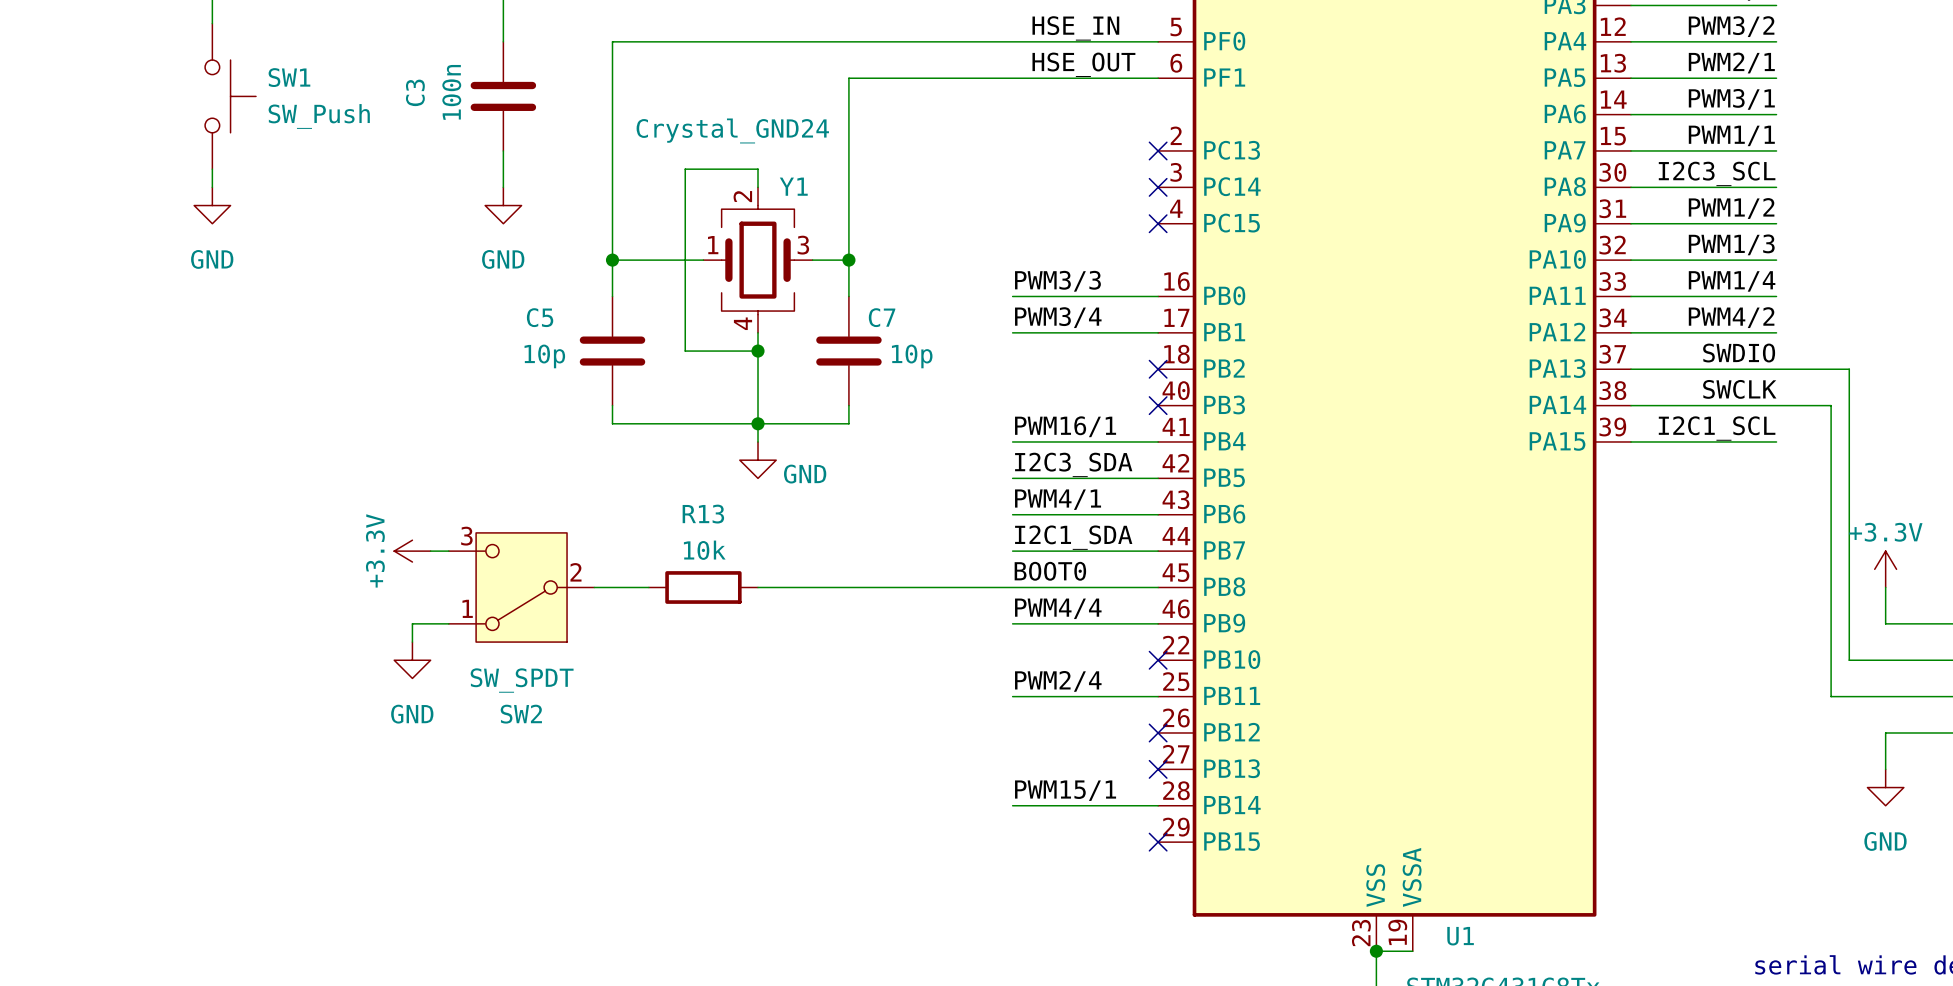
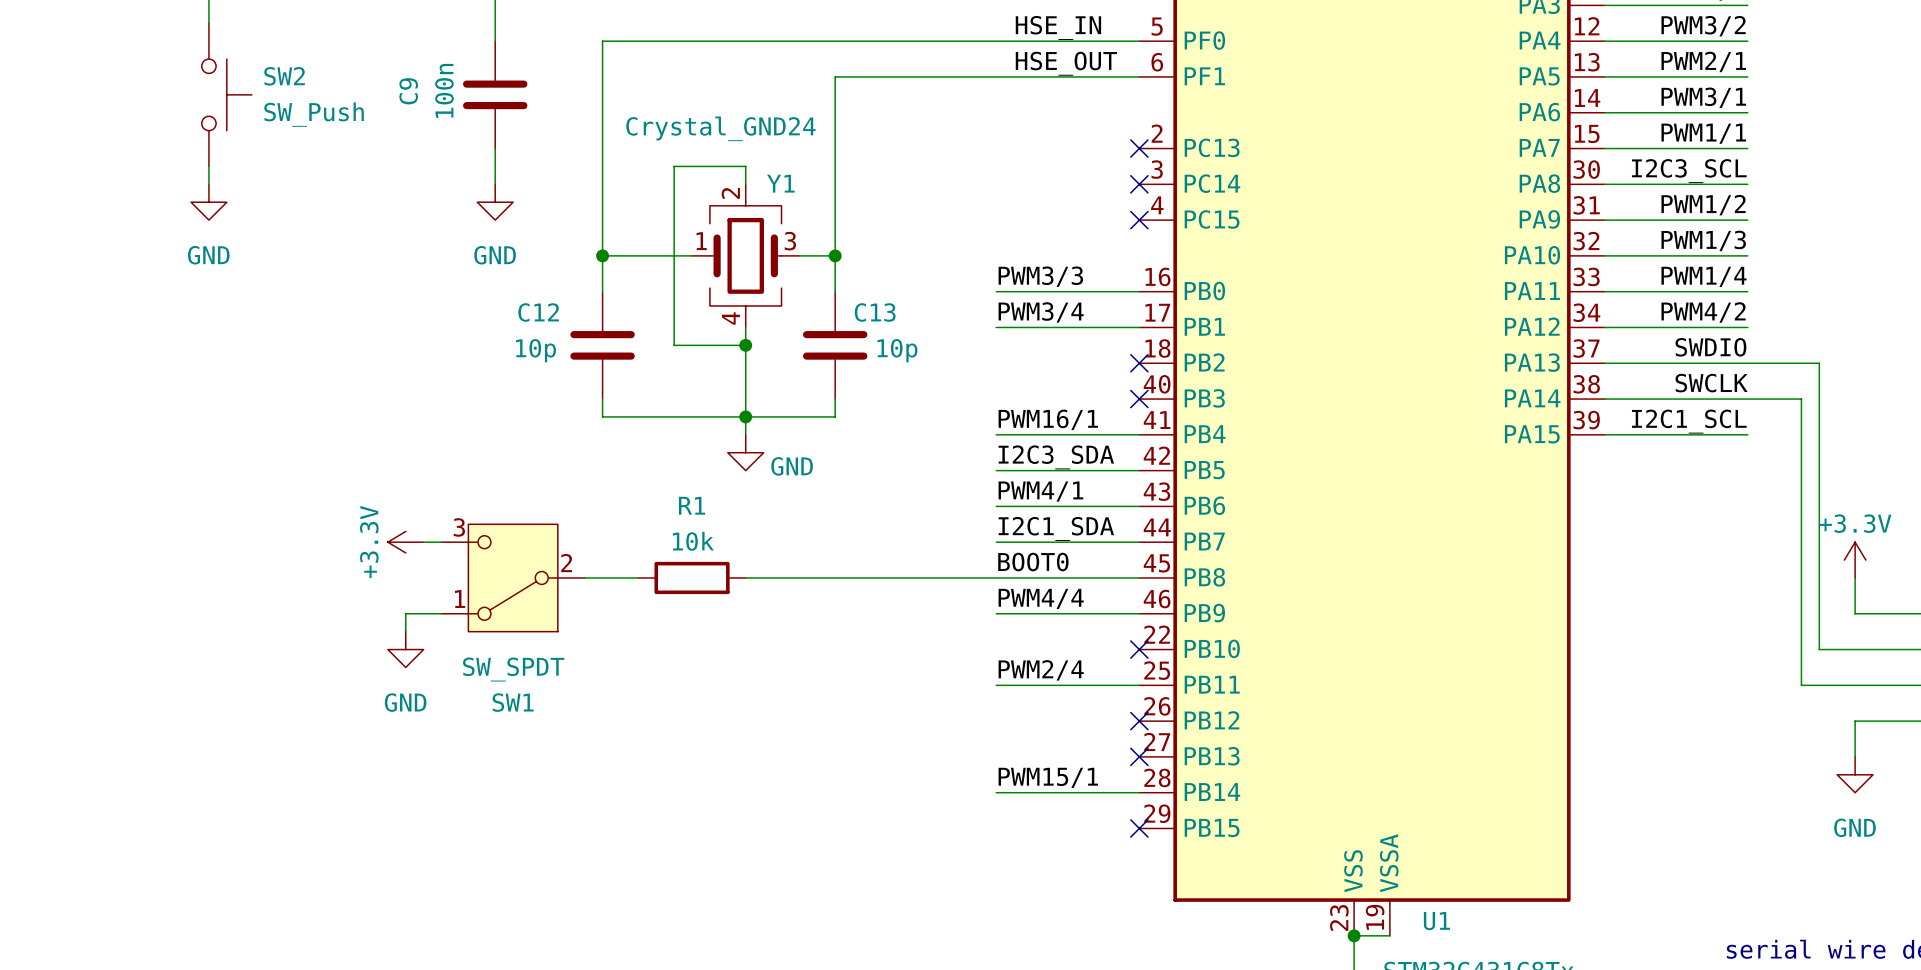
SW1 name: SW1 (289, 77) -> SW2 (284, 76)
C3 name: C3 (415, 92) -> C9 (408, 91)
C5 name: C5 (540, 317) -> C12 (538, 312)
C7 name: C7 (882, 317) -> C13 (875, 312)
R13 name: R13 (703, 514) -> R1 (692, 505)
SW2 name: SW2 (521, 714) -> SW1 (513, 702)

